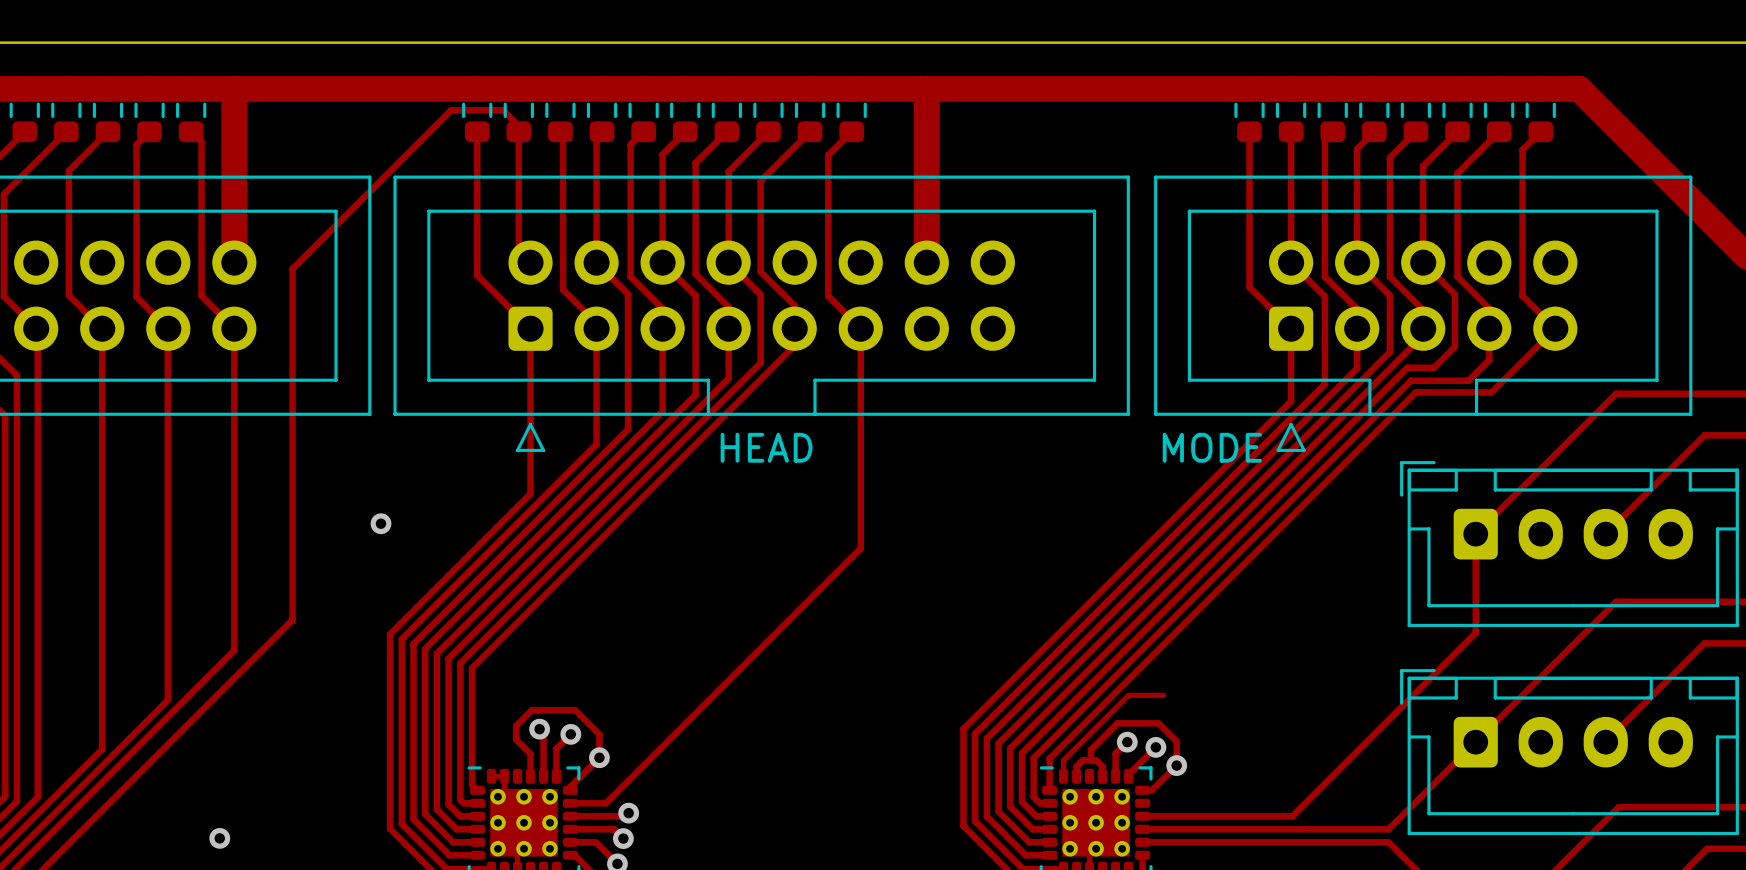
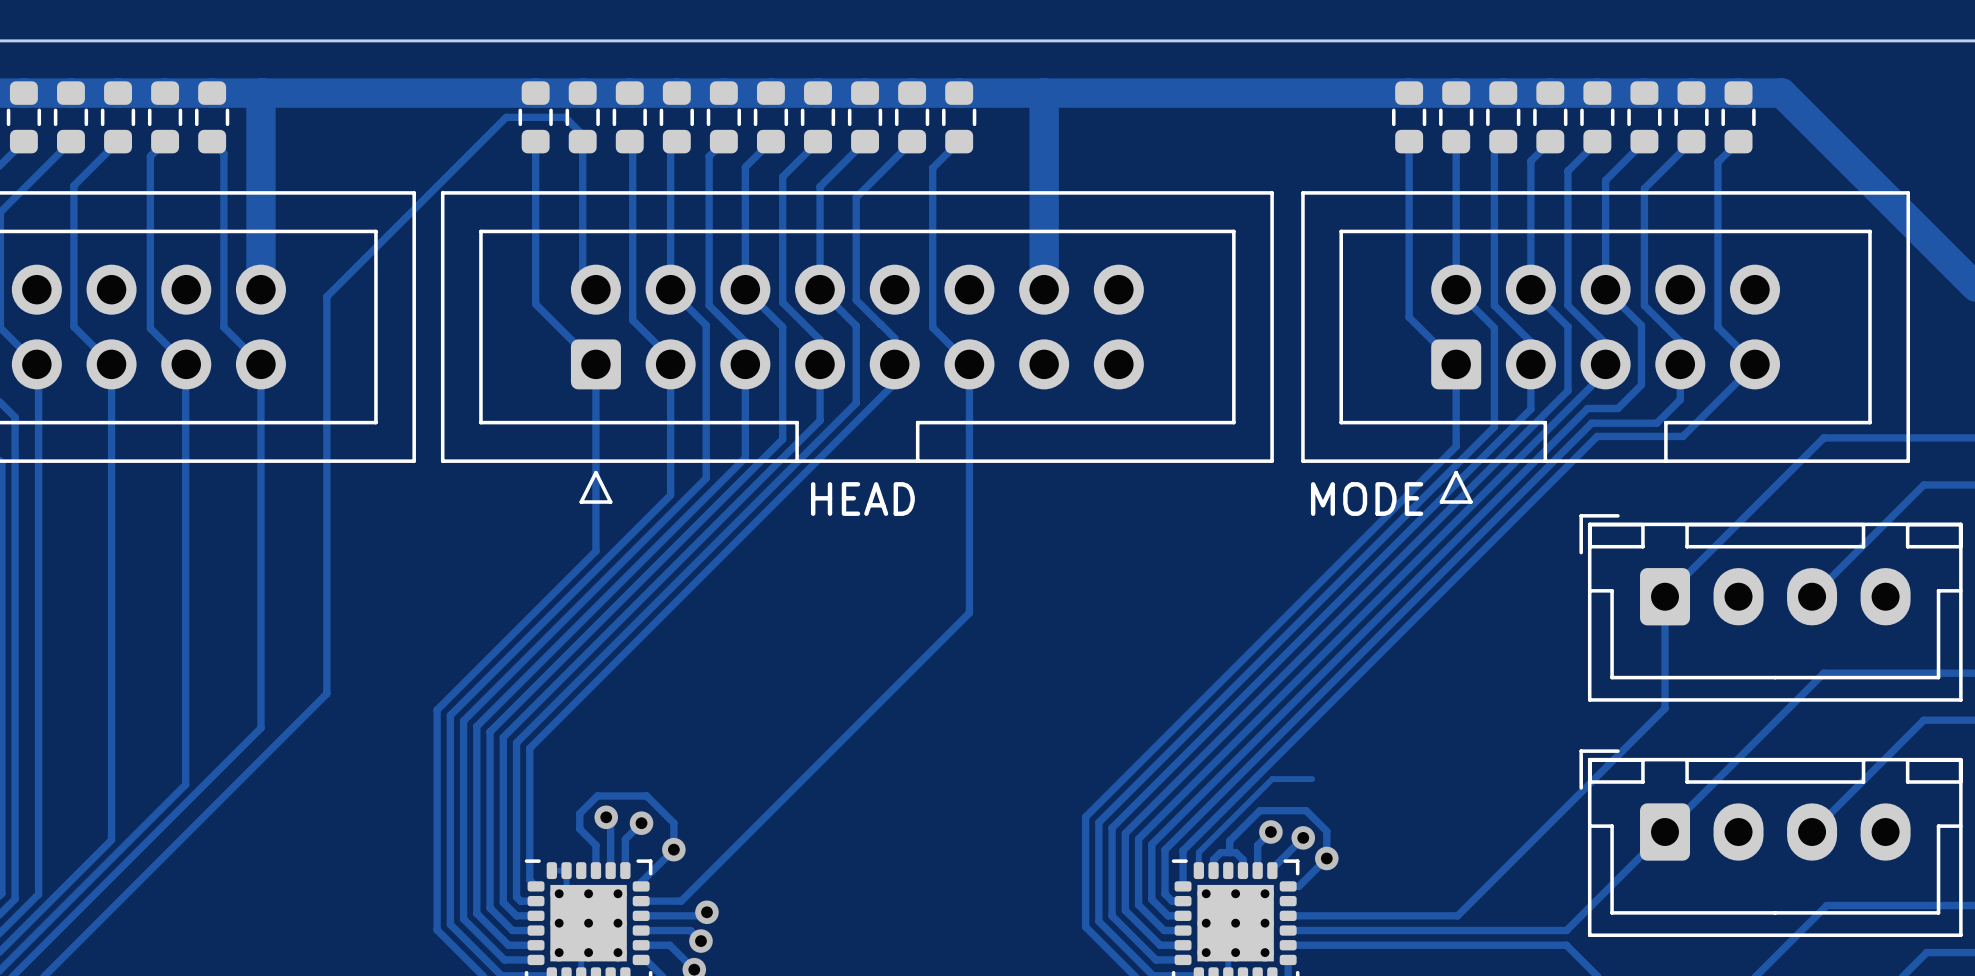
via: (381, 523) -> none
via: (219, 838) -> none

